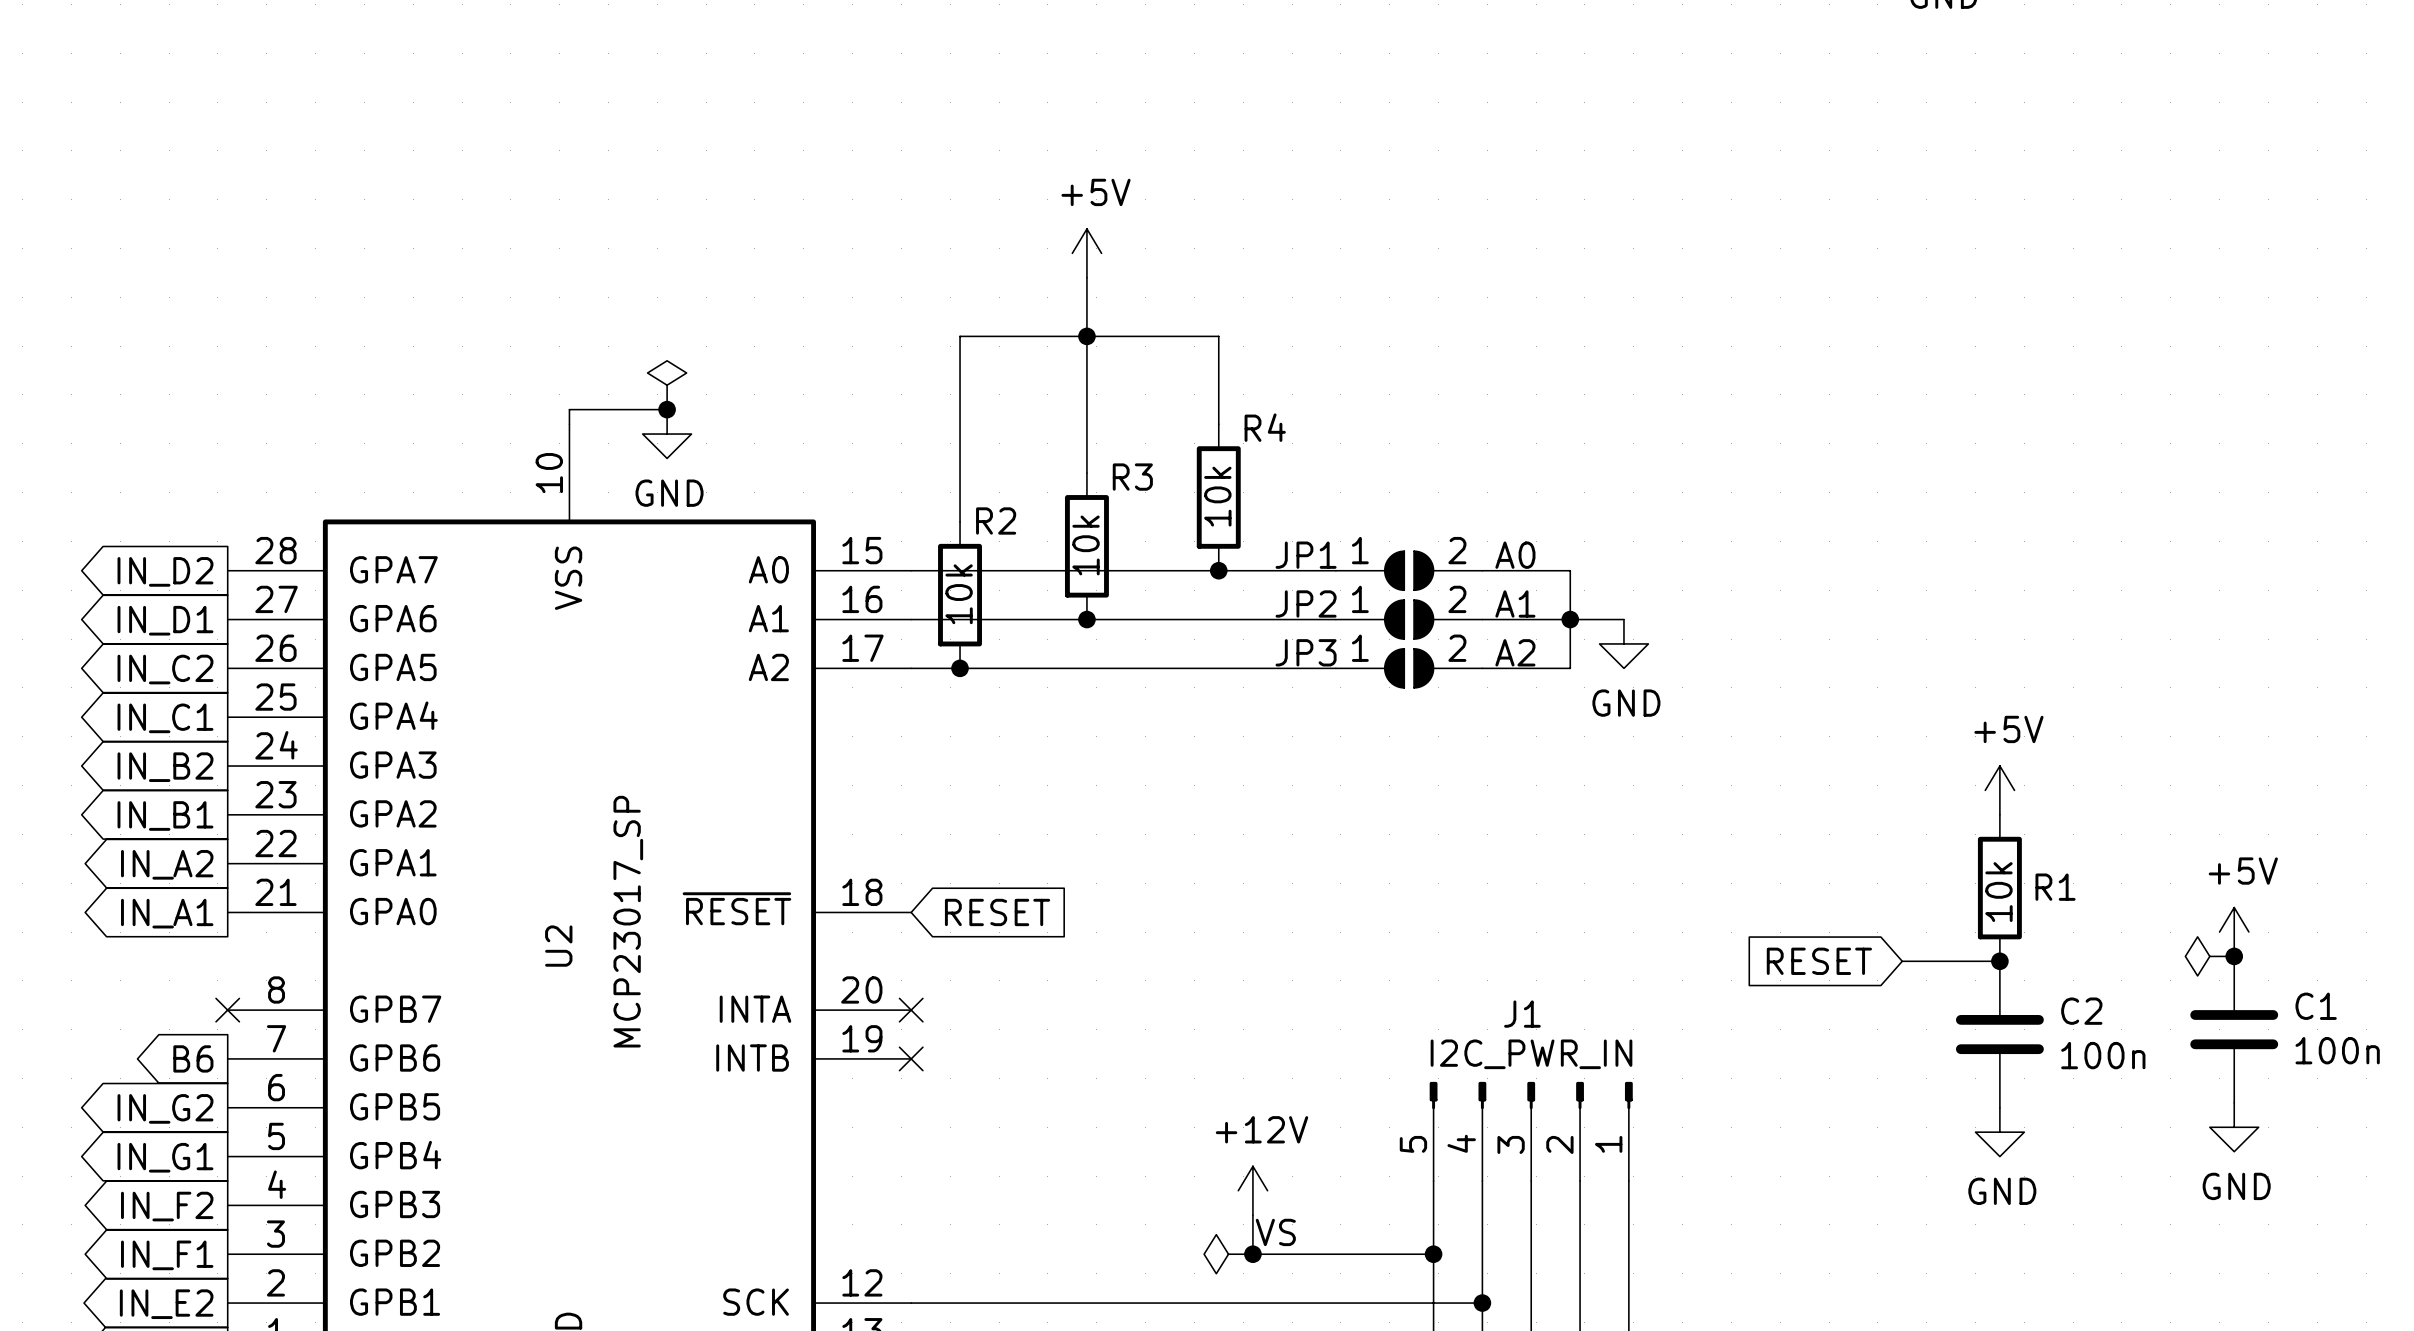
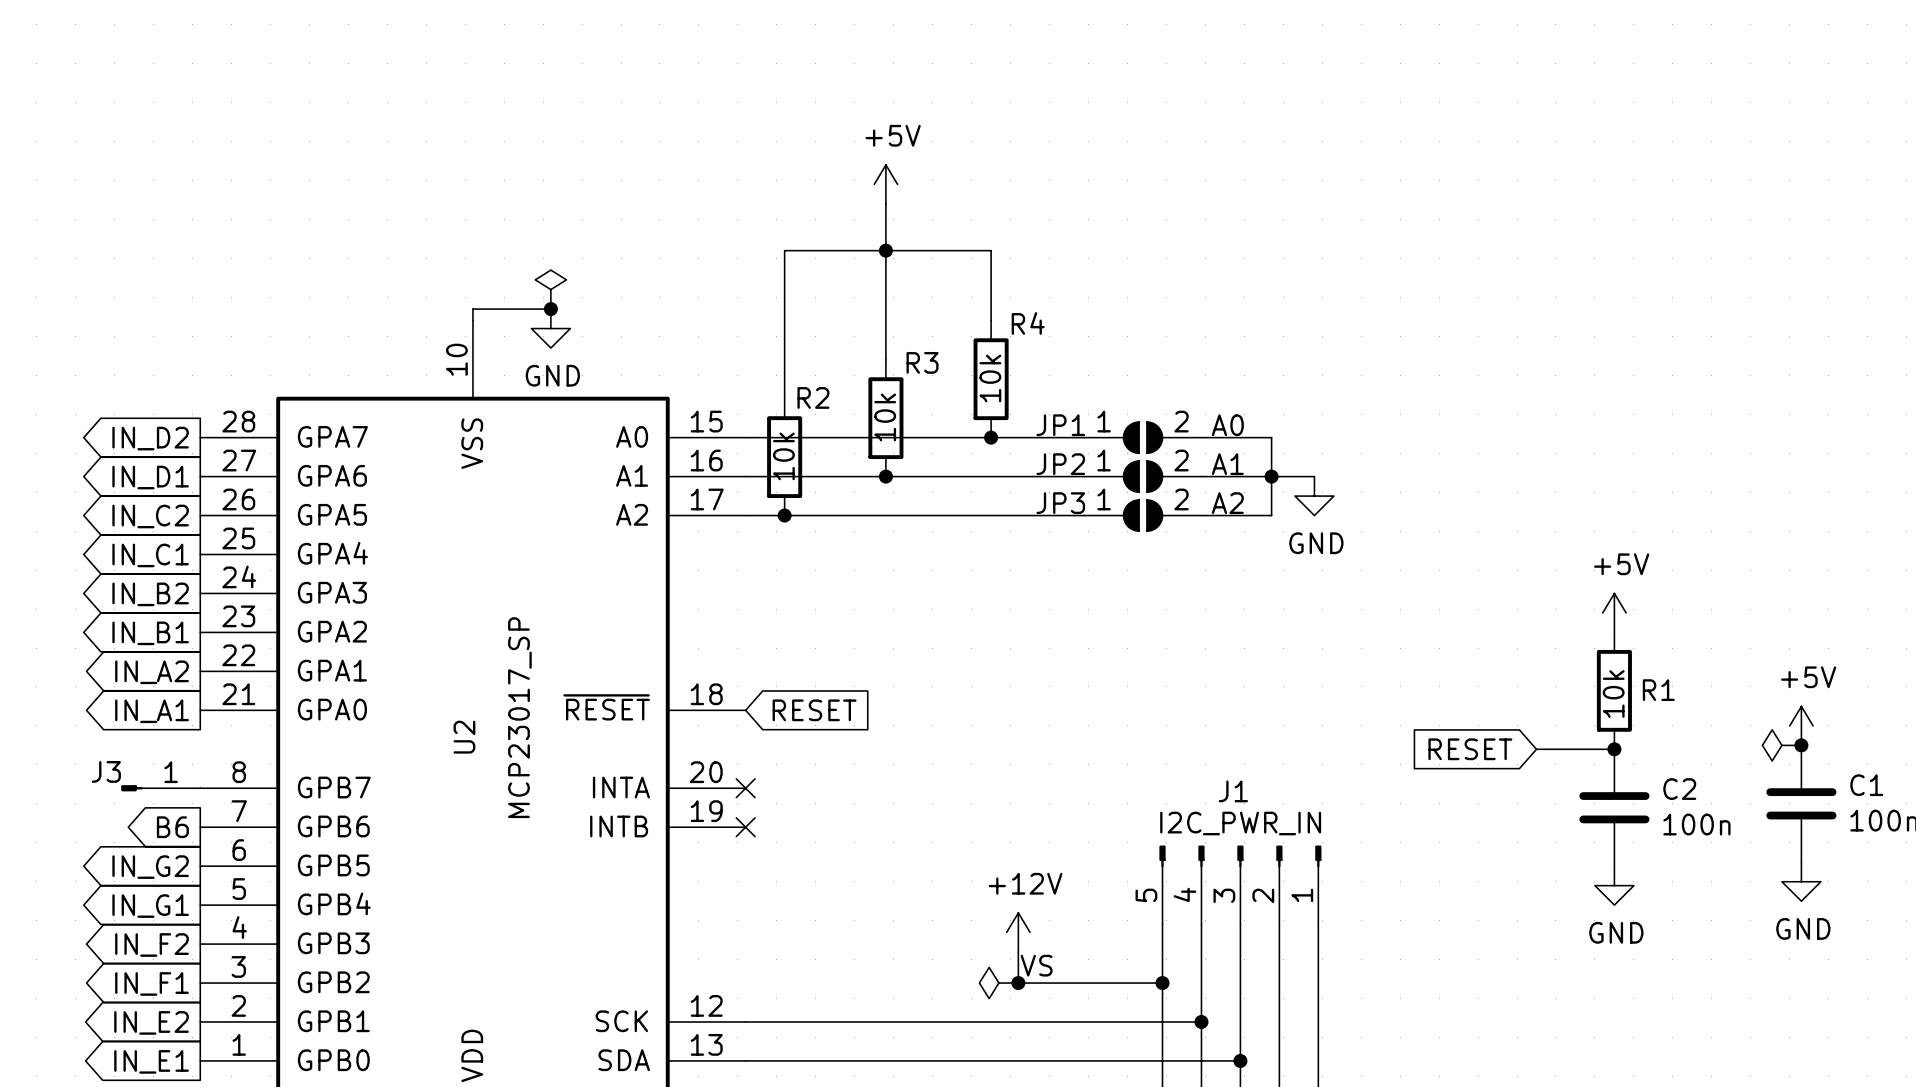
J3: none -> (160, 788)
no-connect mark: (227, 1010) -> none

